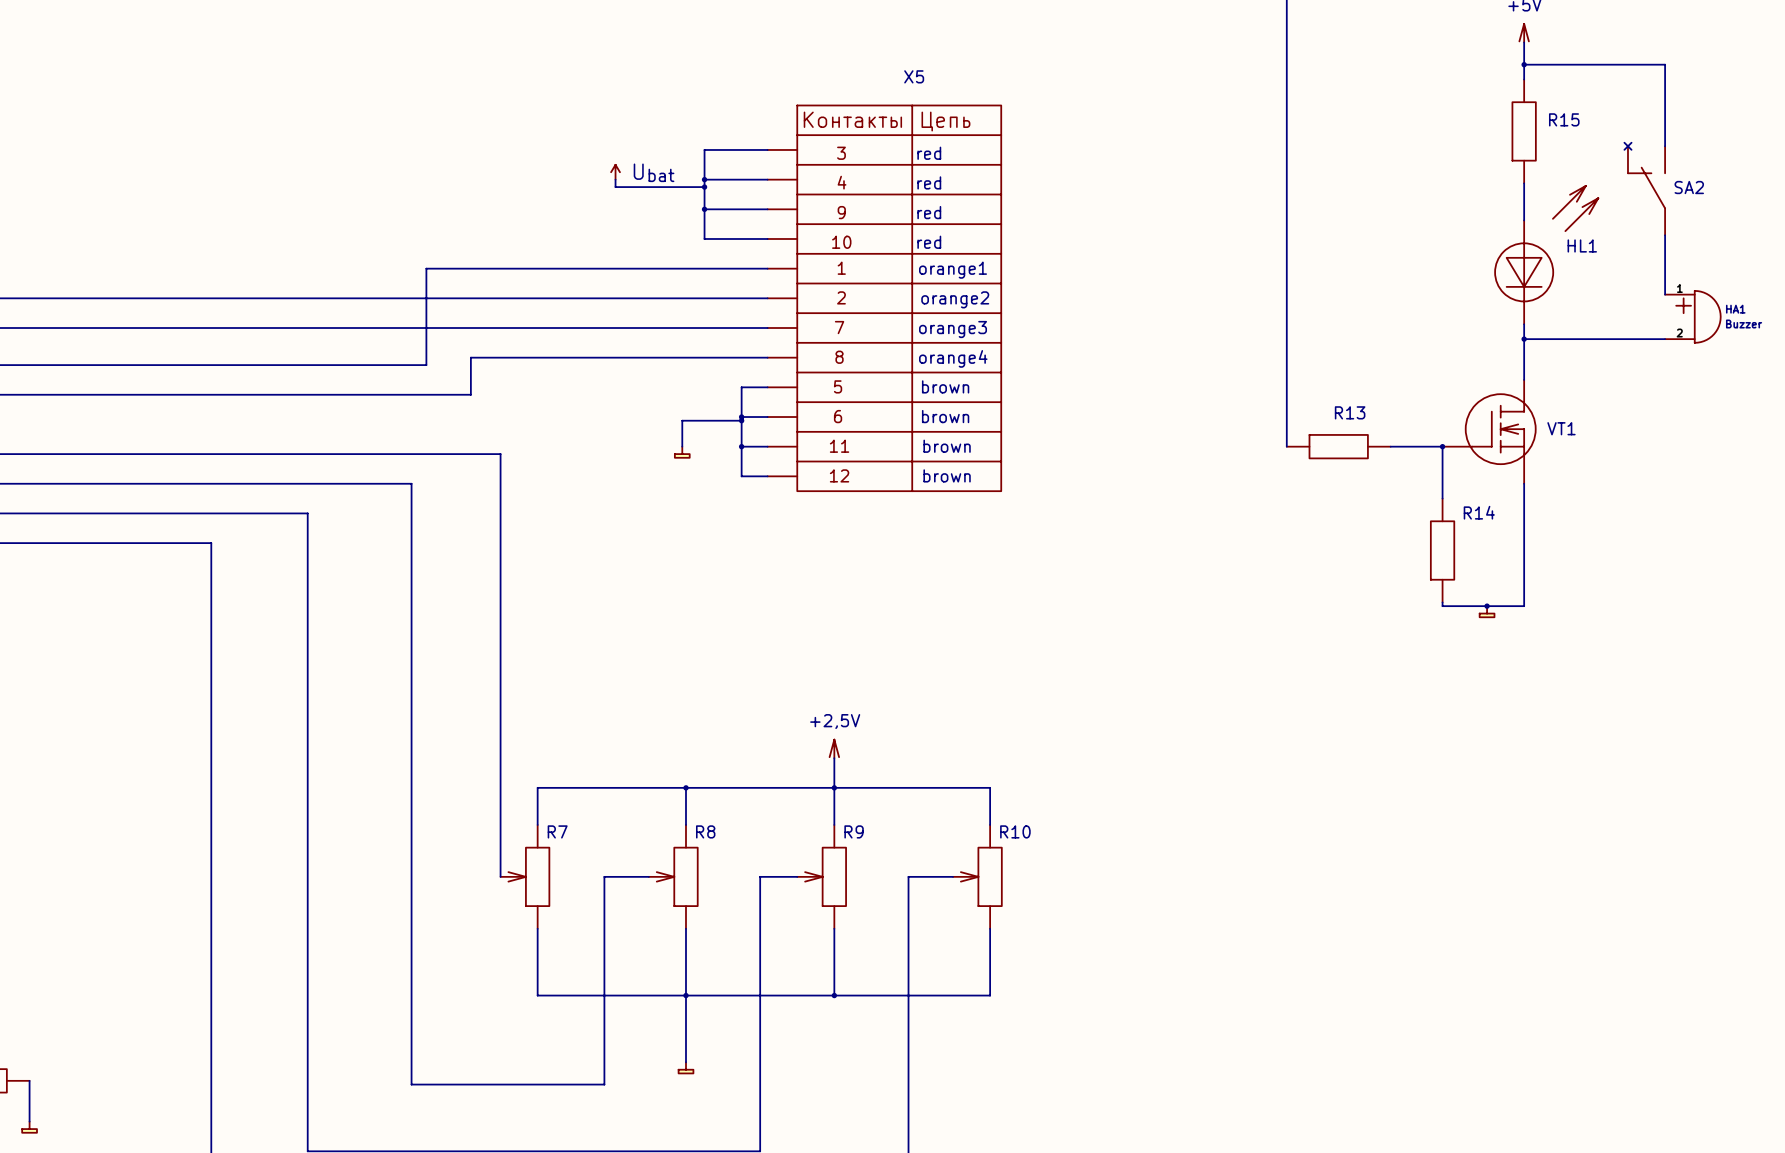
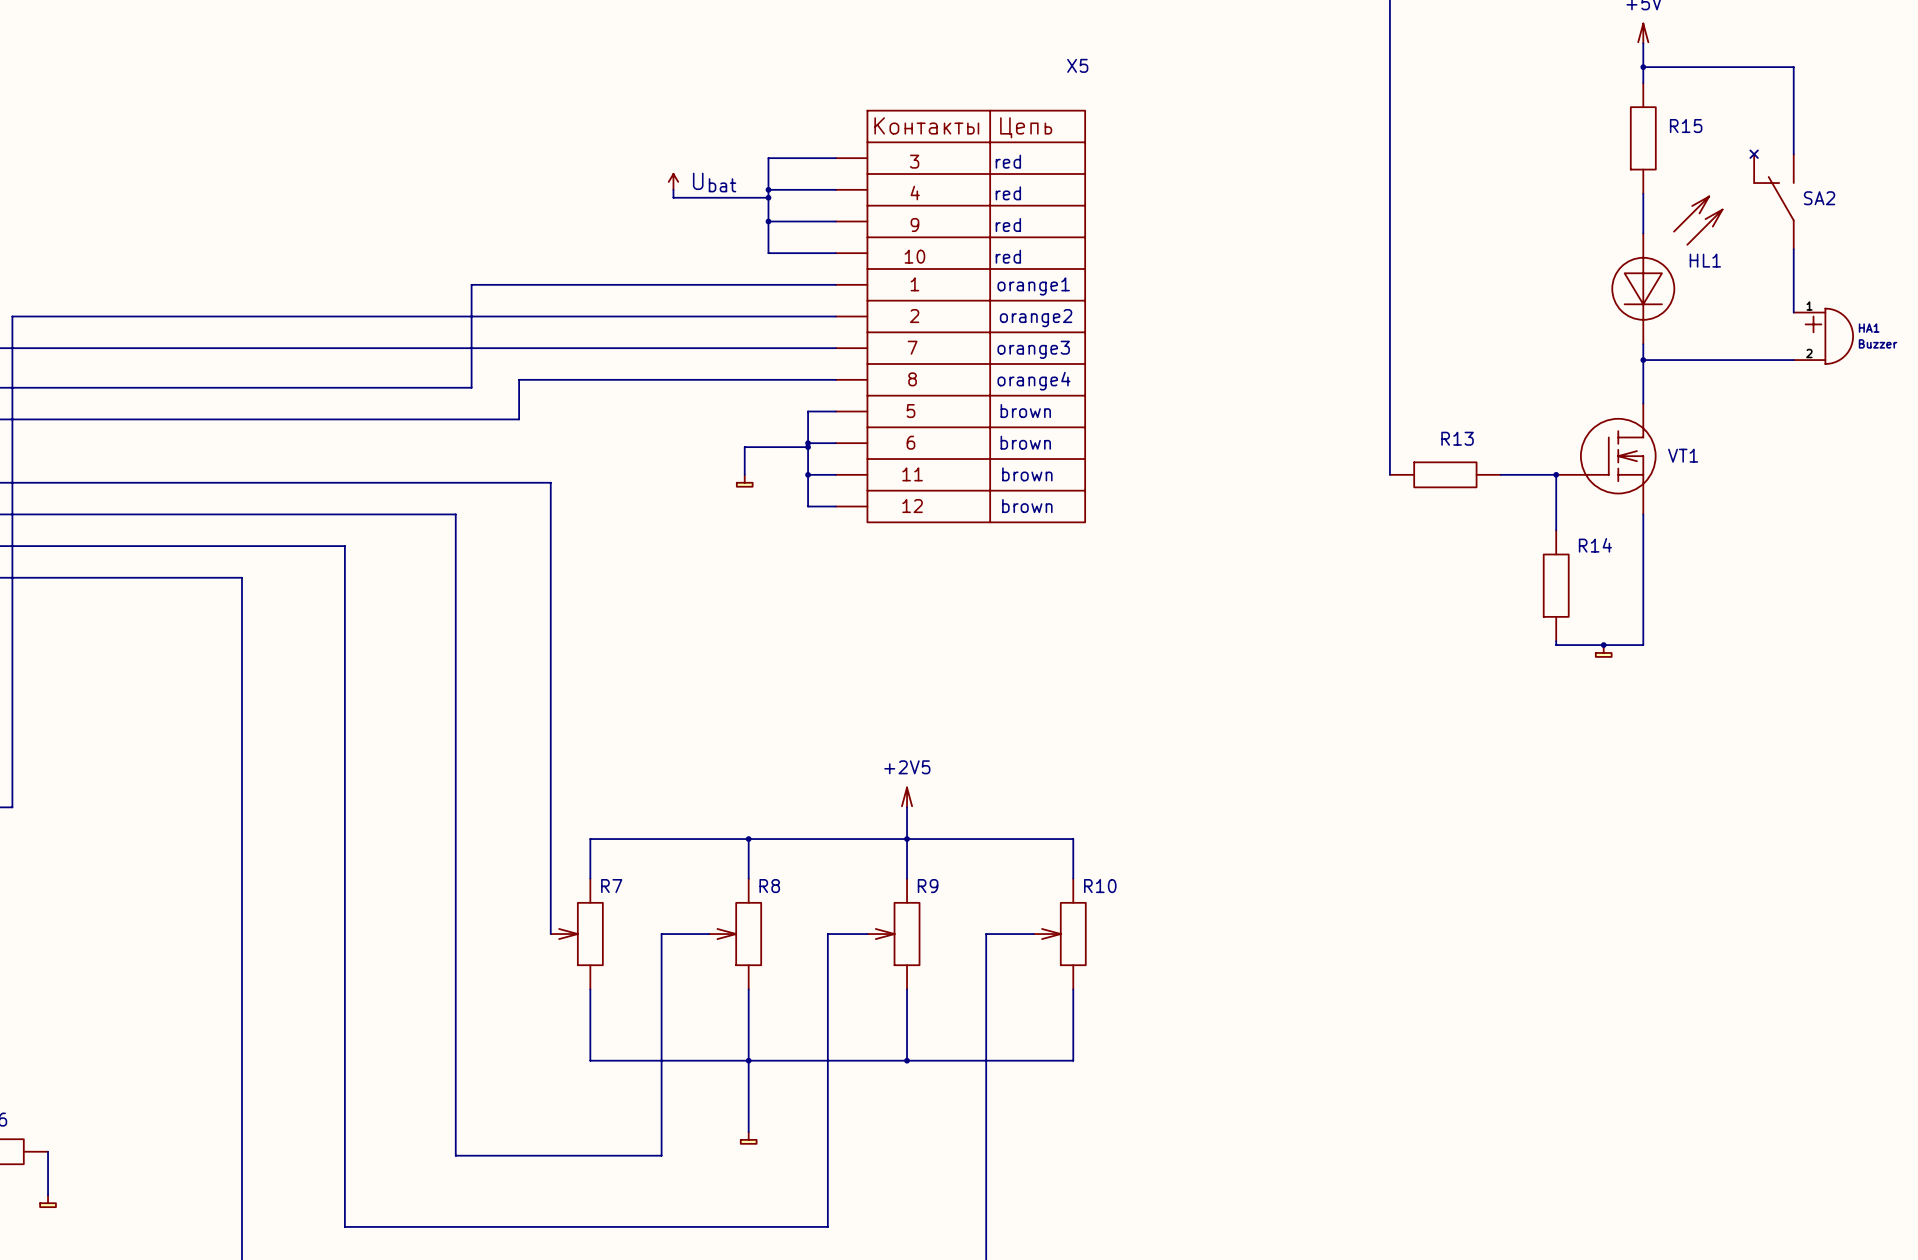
X5 name position: X5 (914, 76) -> X5 (1077, 65)
power symbol: +2,5V (834, 748) -> +2V5 (907, 797)

